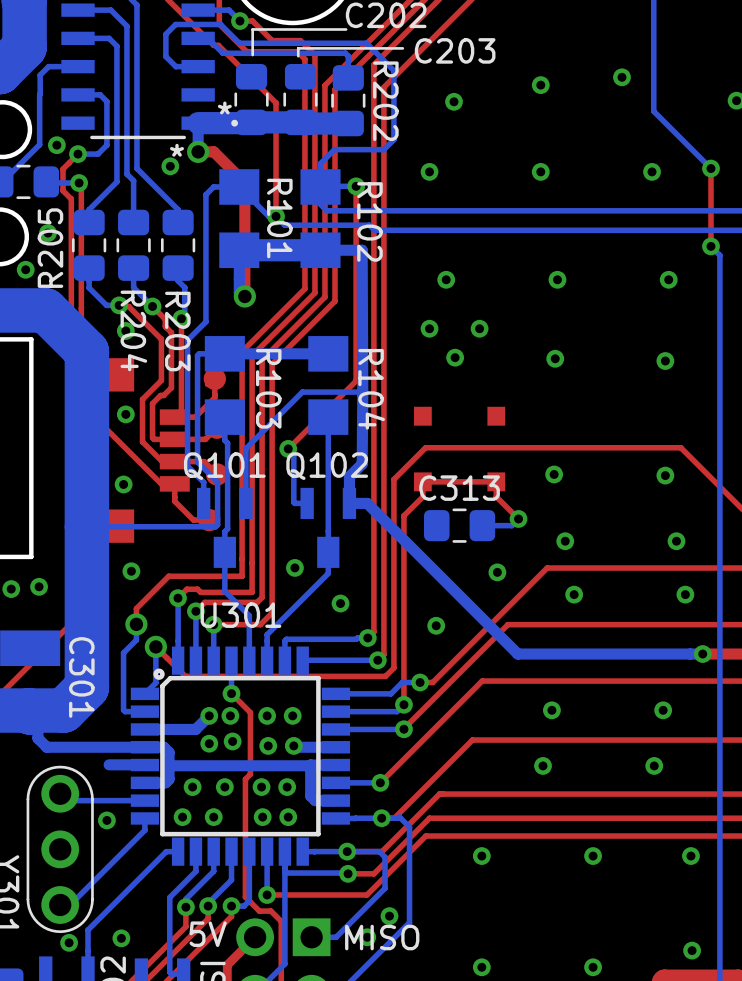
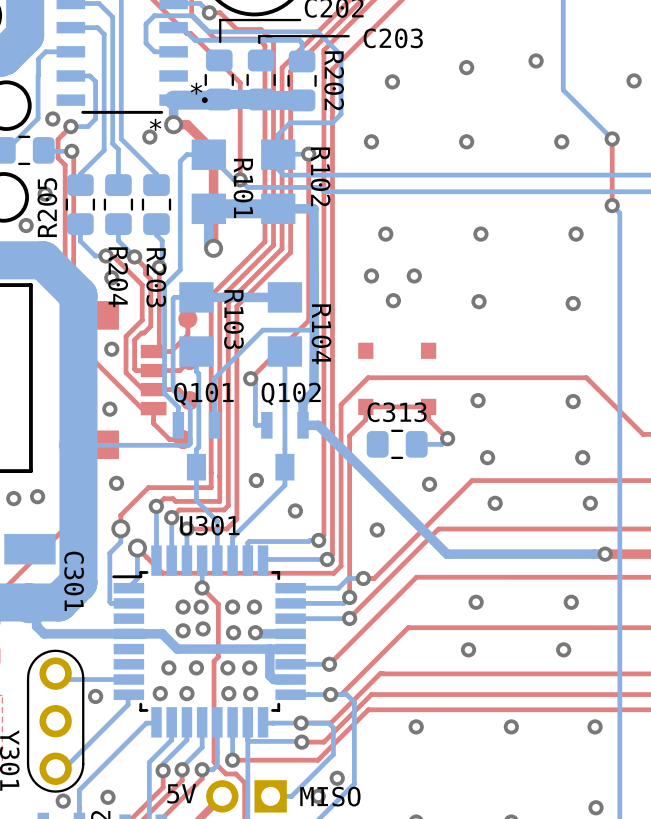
U301 footprint: [130, 646, 351, 866] -> [112, 545, 306, 738]
bottom track: (209, 715) (195, 729) (144, 729) -> none
bottom track: (163, 747) (169, 752) (169, 779) (165, 782) (144, 782) -> (144, 633) (162, 633) (177, 649) (269, 649)
bottom track: (144, 764) (109, 764) -> none
bottom track: (309, 765) (169, 765) -> none

